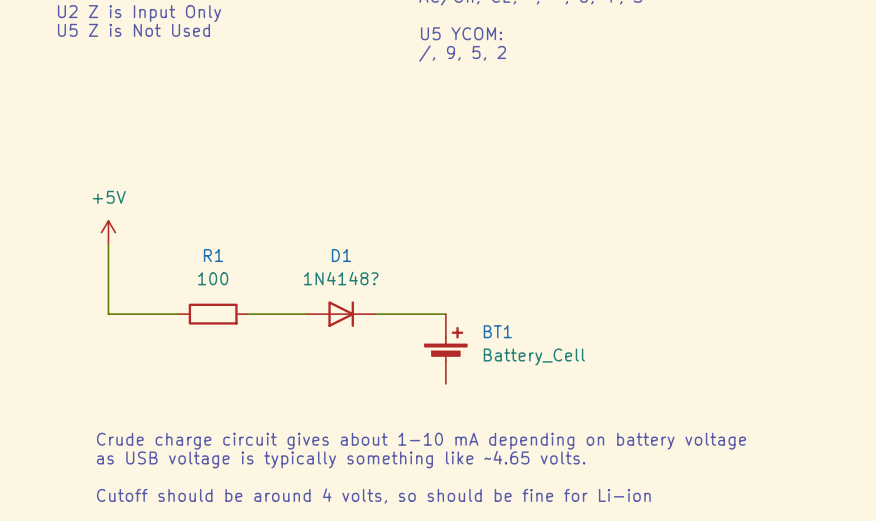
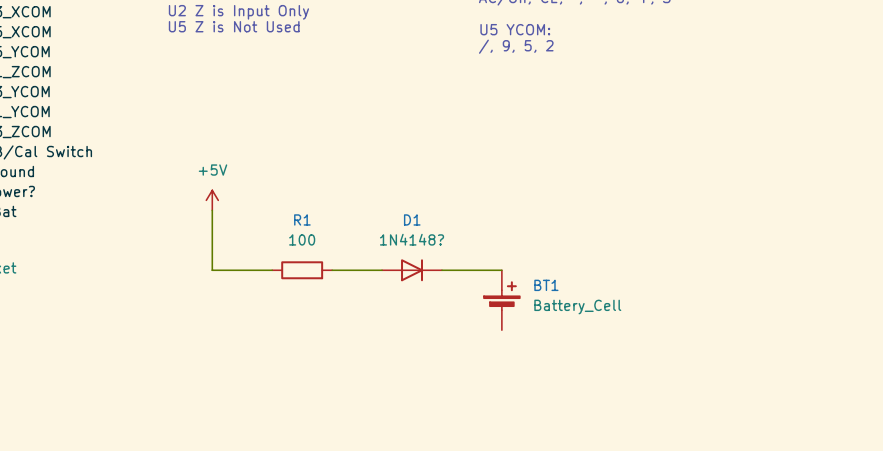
text: Crude charge circuit gives about 1-10 mA depending on battery voltage (421, 441) -> none
text: as USB voltage is typically something like ~4.65 volts. (341, 459) -> none
text: Cutoff should be around 4 volts, so should be fine for Li-ion (373, 495) -> none

